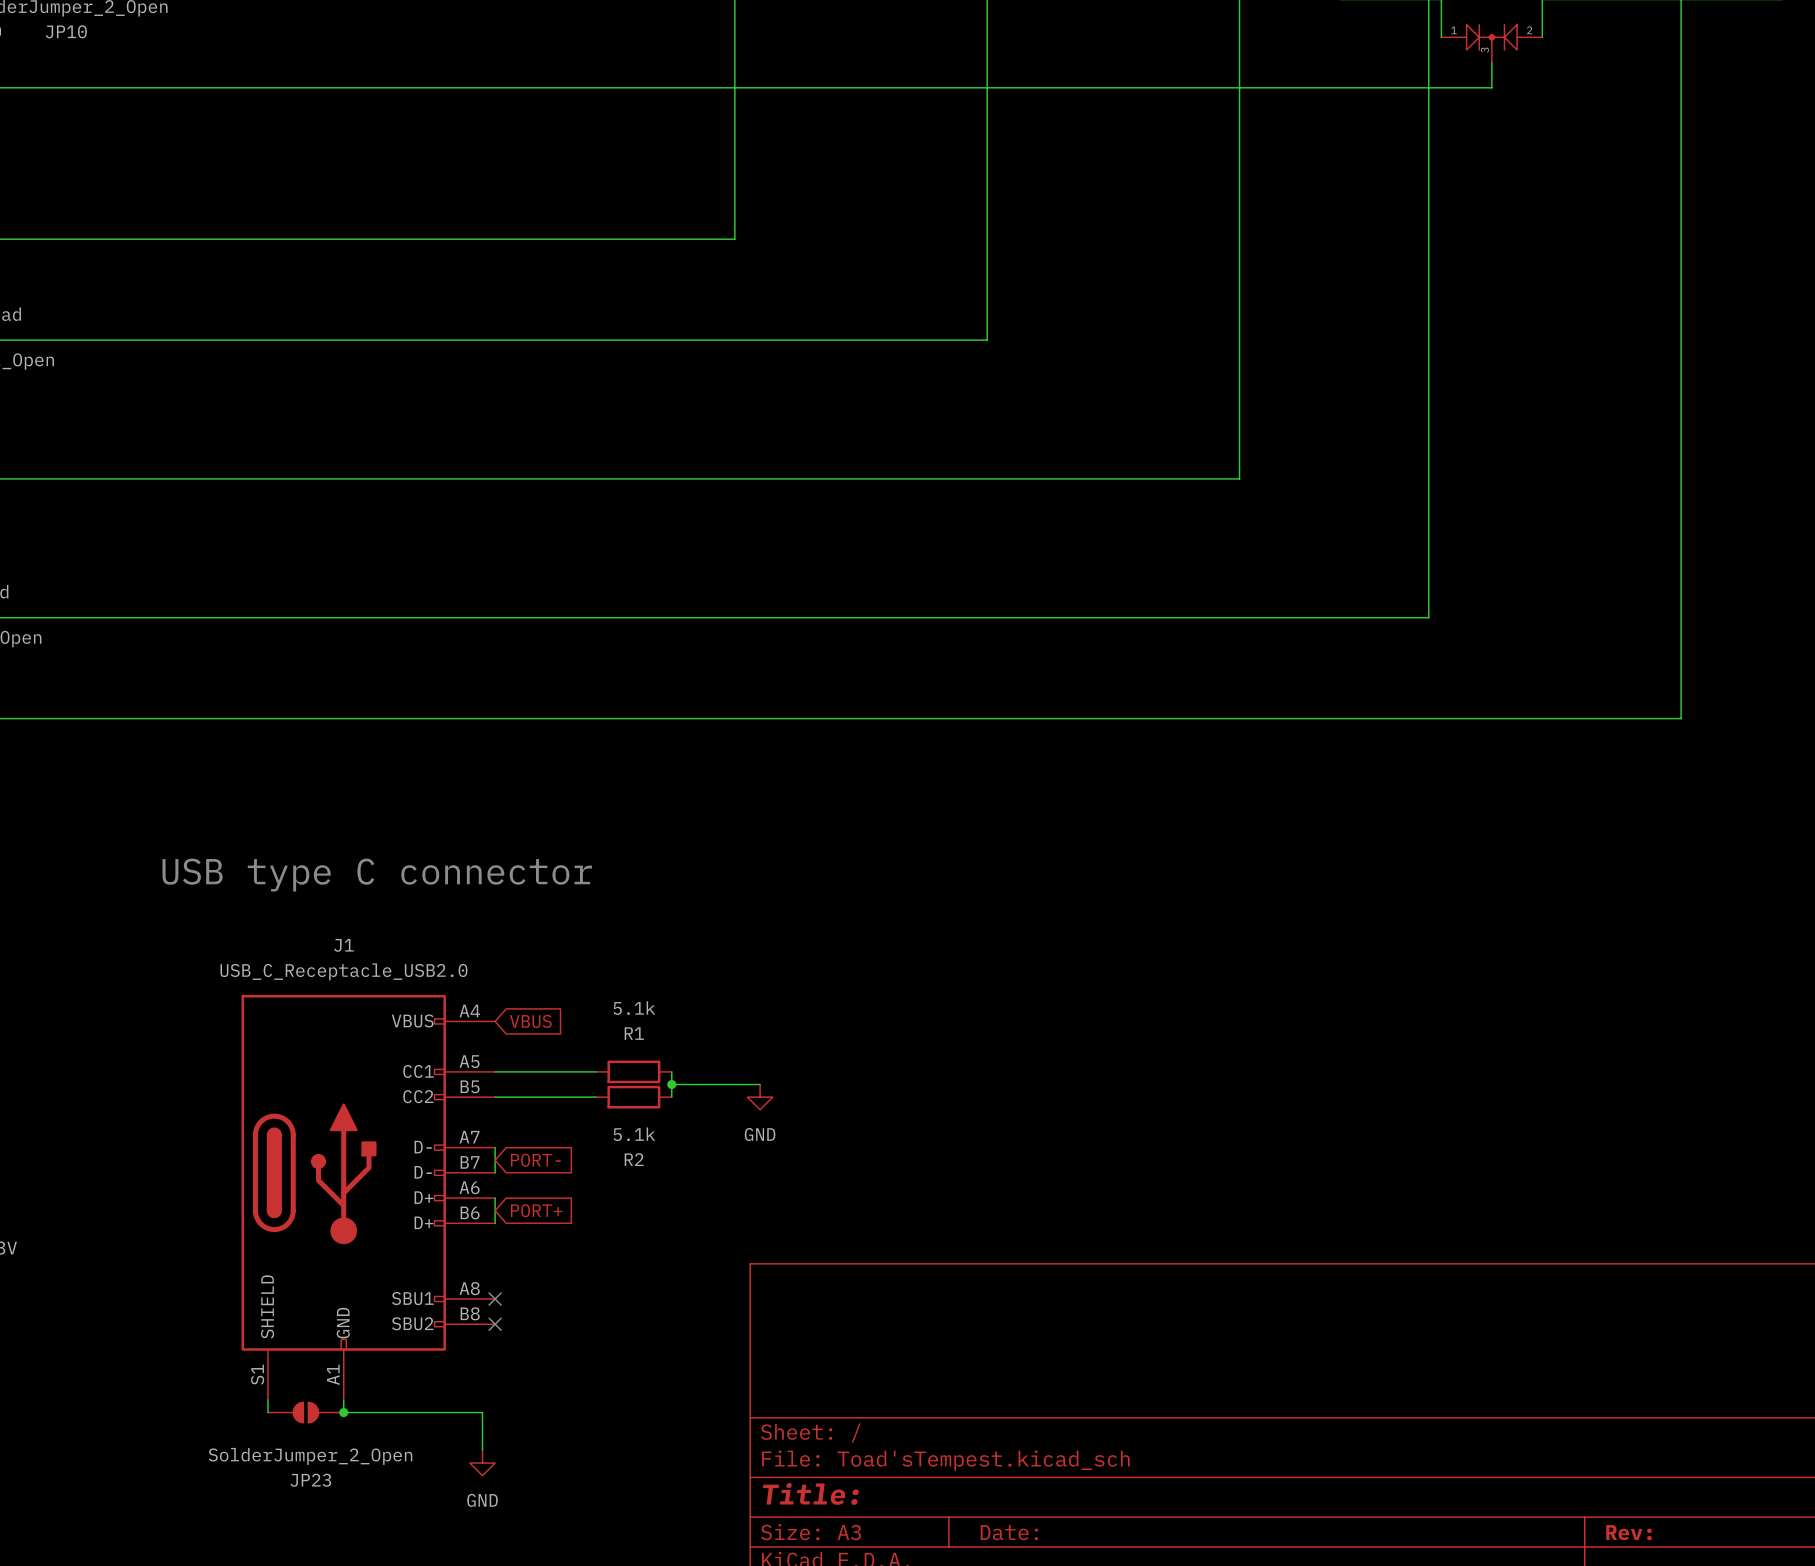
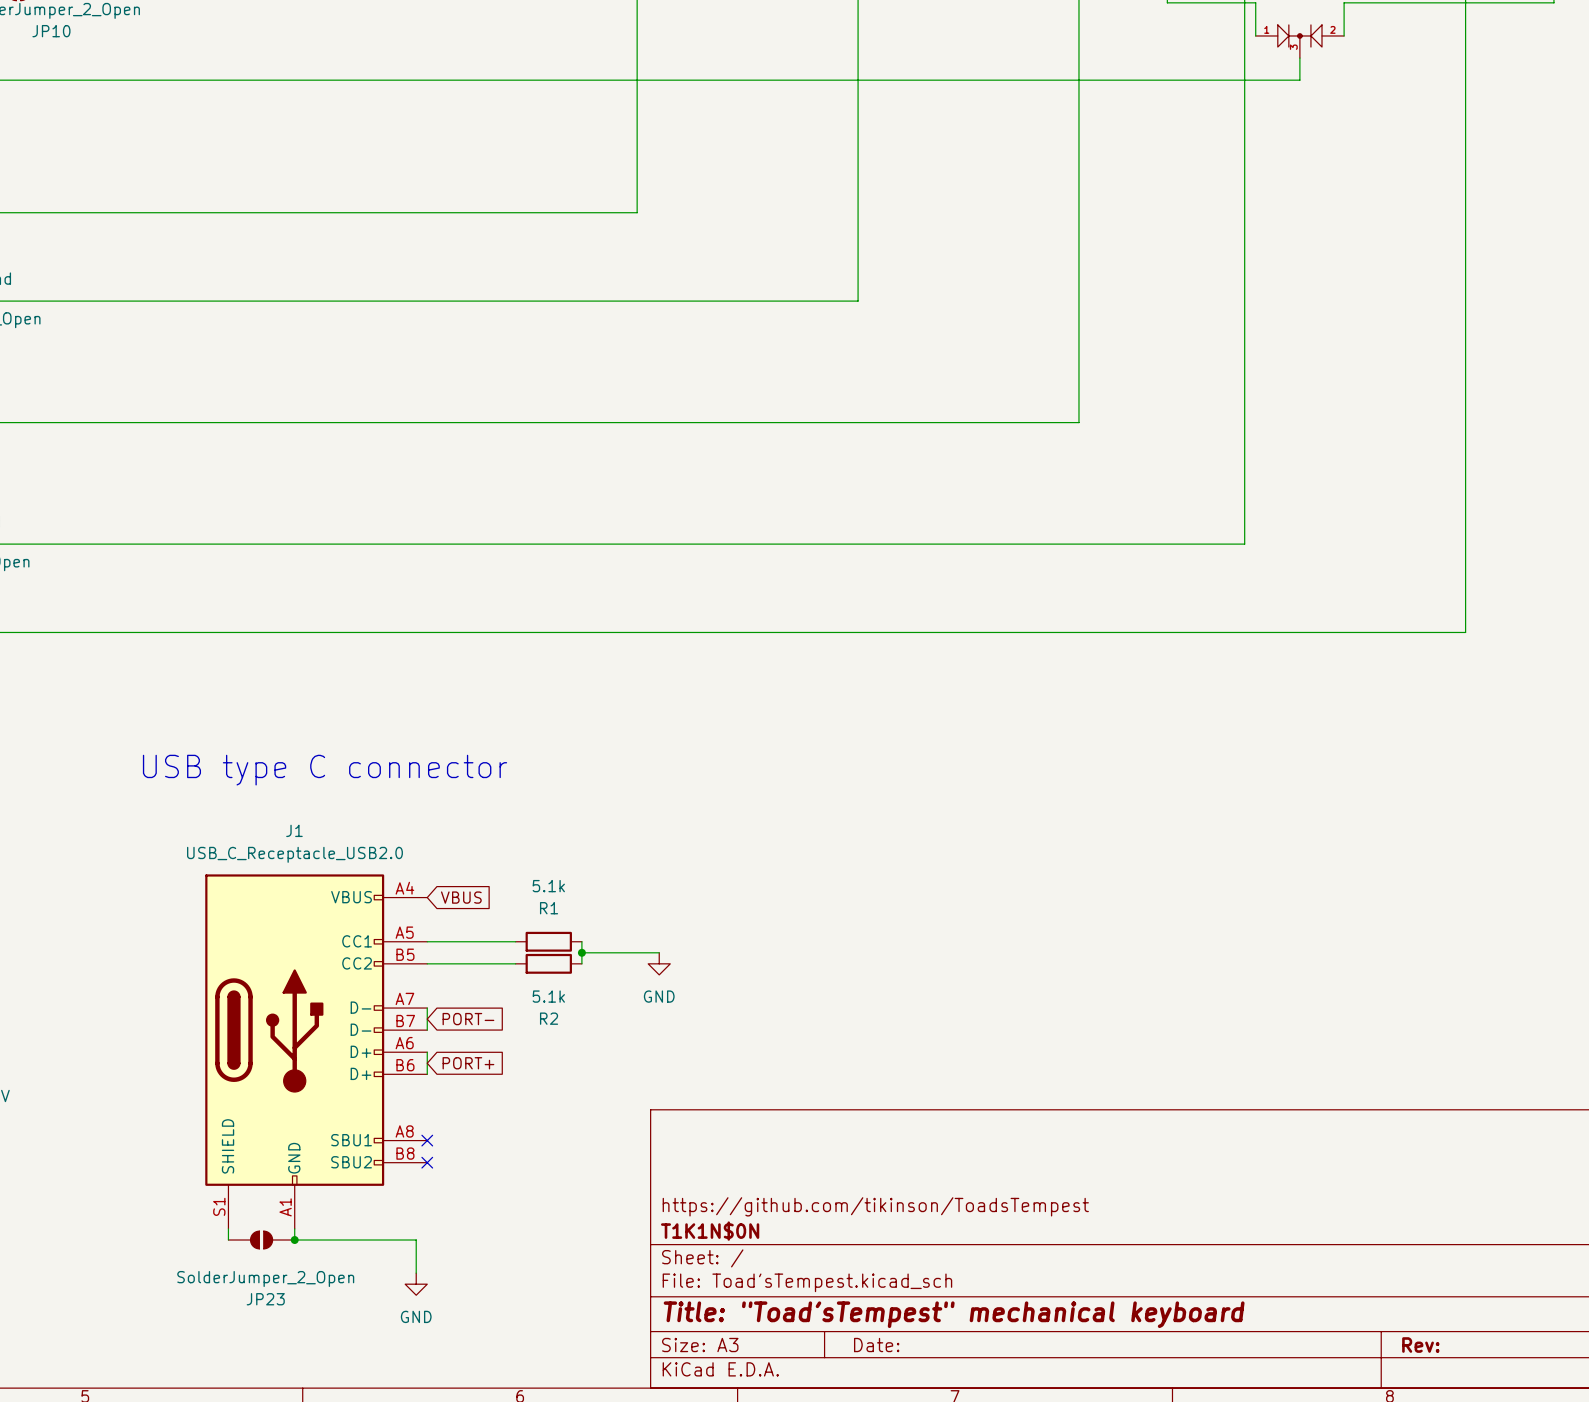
title block: none -> https://github.com/tikinson/ToadsTempest (875, 1206)
title block: none -> T1K1N$0N (710, 1231)
title block: Title: (810, 1493) -> Title: "Toad'sTempest" mechanical keyboard (954, 1314)

